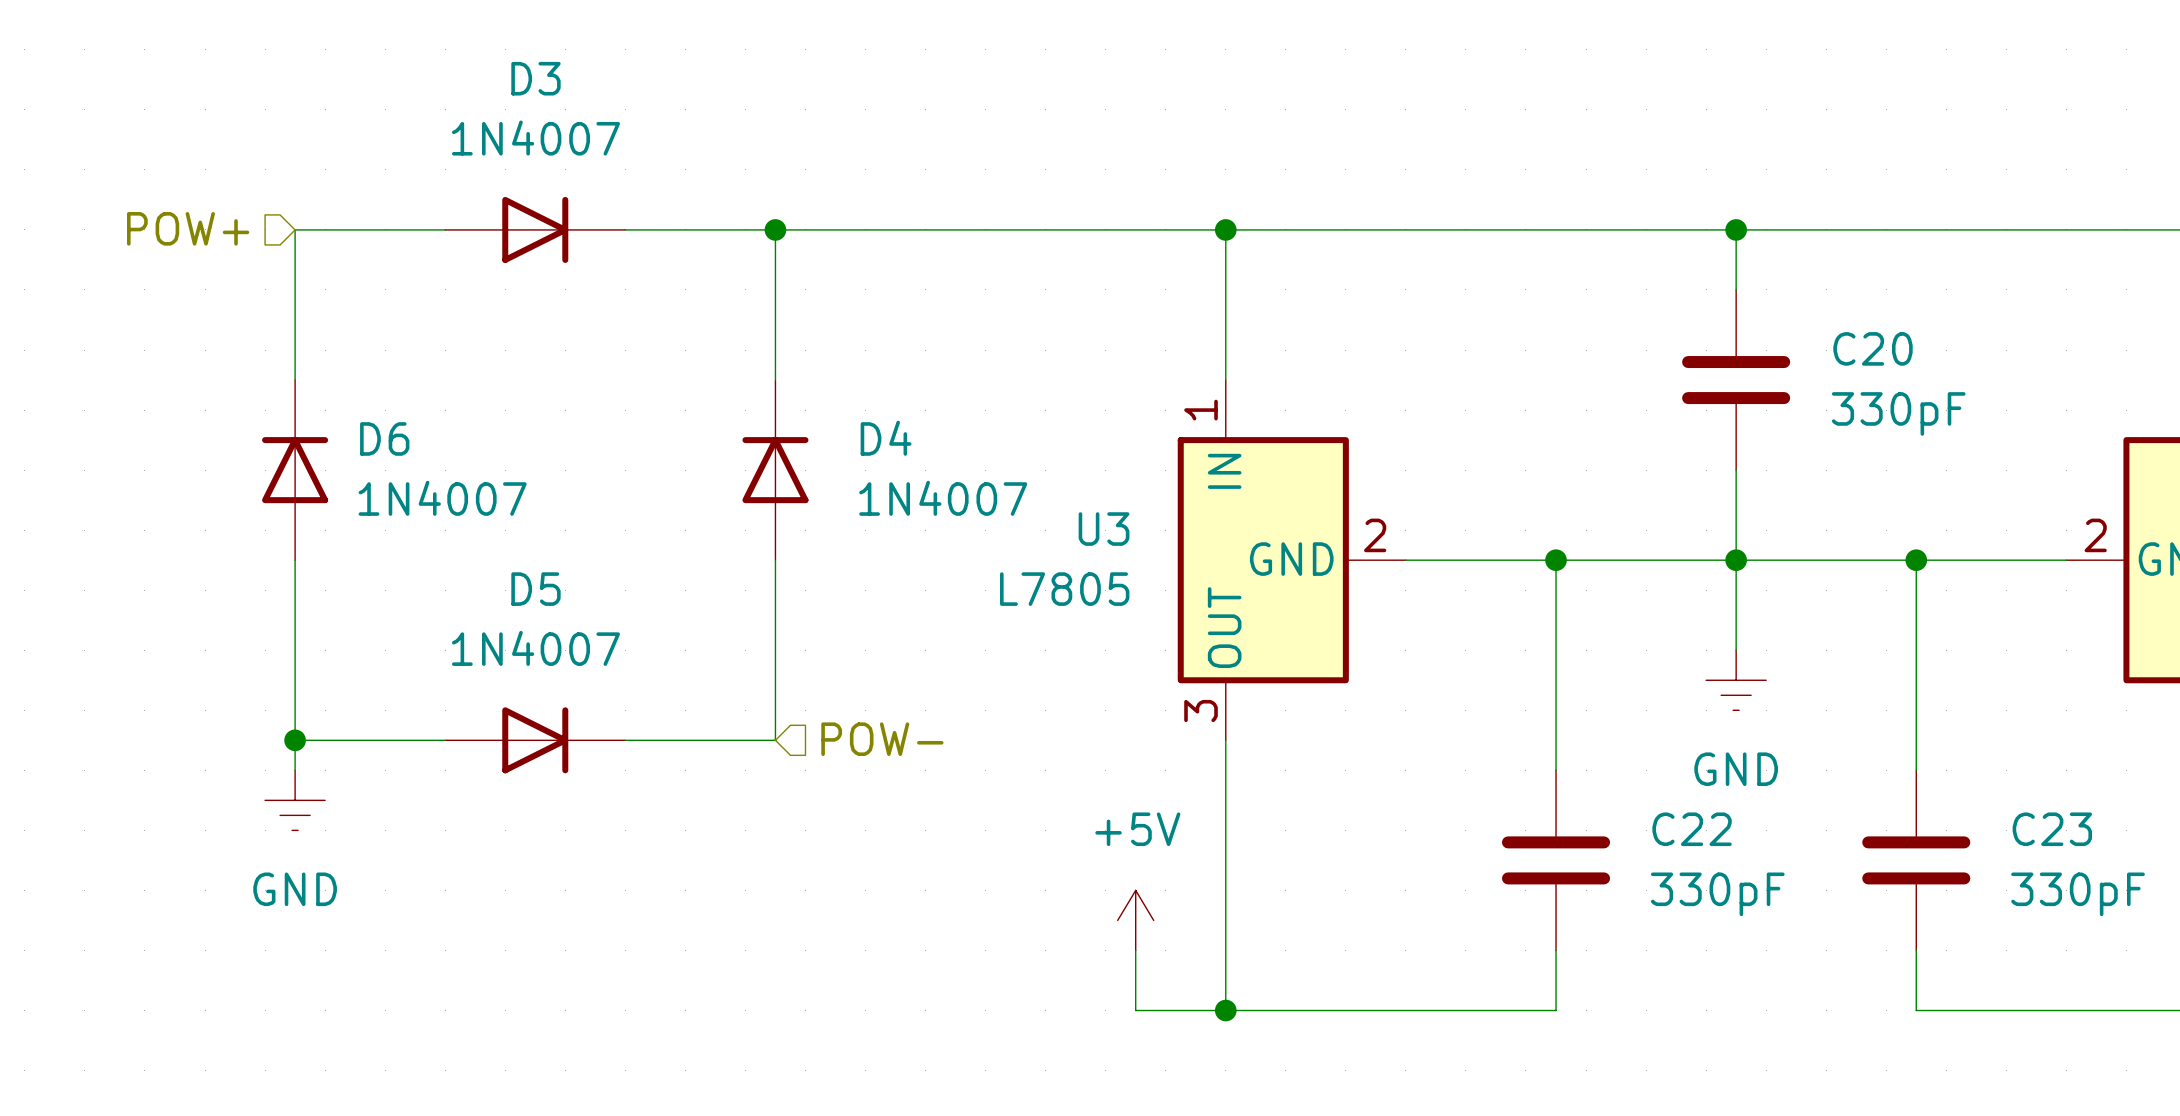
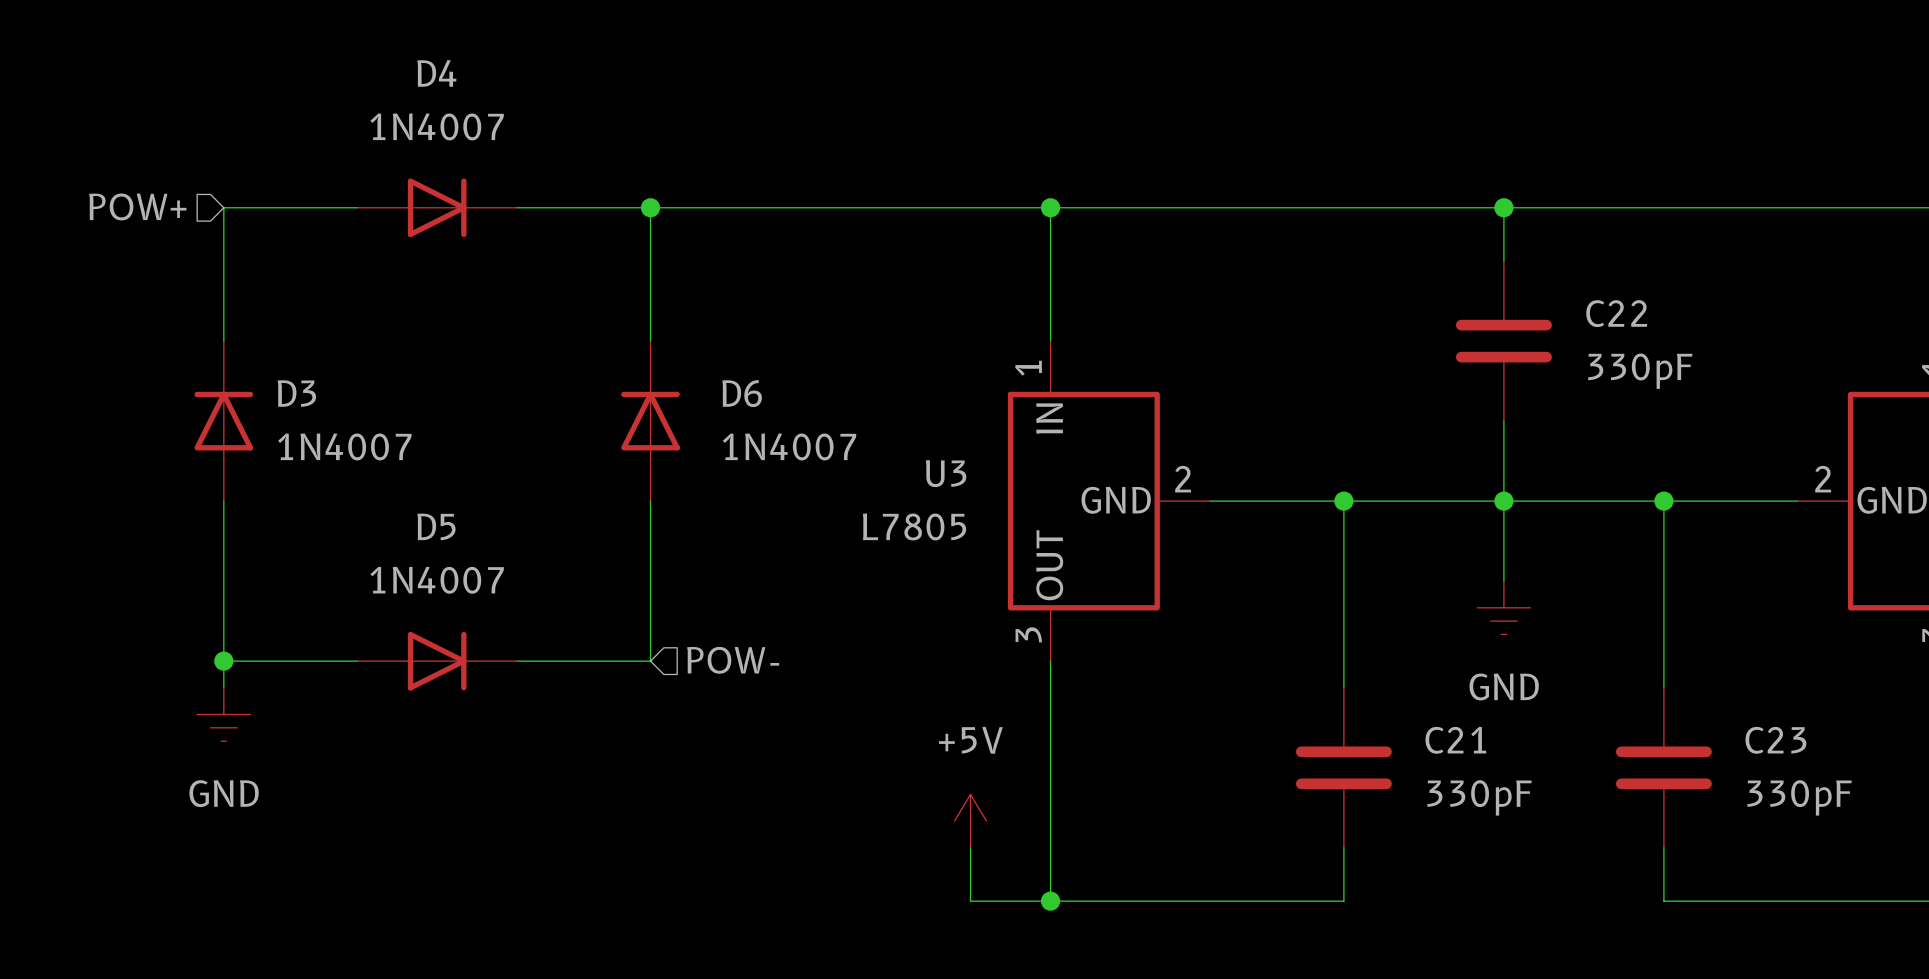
D3 name: D3 (535, 78) -> D4 (436, 73)
C20 name: C20 (1873, 348) -> C22 (1616, 313)
D6 name: D6 (384, 438) -> D3 (296, 393)
D4 name: D4 (886, 438) -> D6 (742, 393)
C22 name: C22 (1692, 829) -> C21 (1455, 740)

